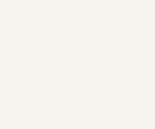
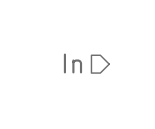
hierarchical label: none -> In (72, 63)

